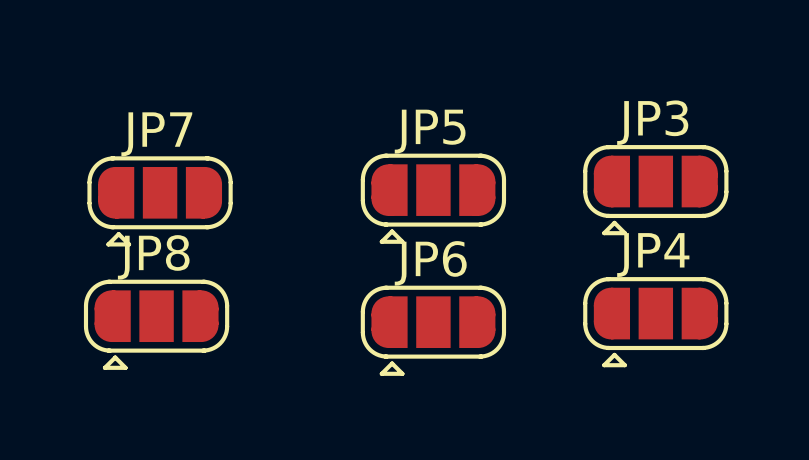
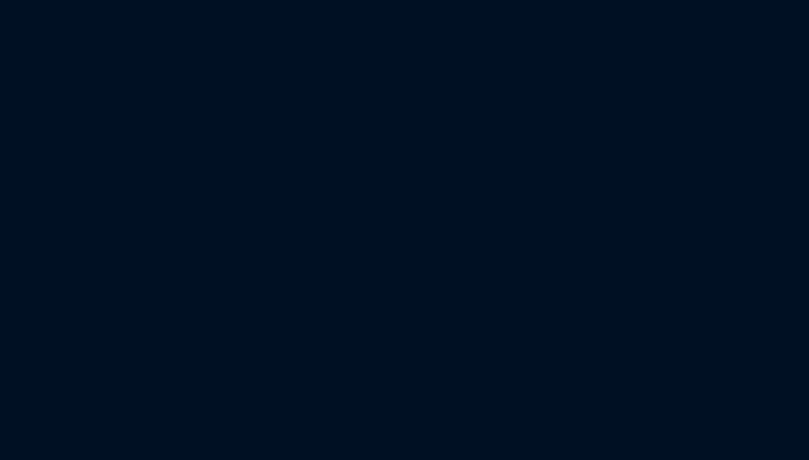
JP3: (655, 190) -> none
JP5: (433, 198) -> none
JP7: (160, 201) -> none
JP4: (655, 322) -> none
JP8: (156, 324) -> none
JP6: (433, 330) -> none

